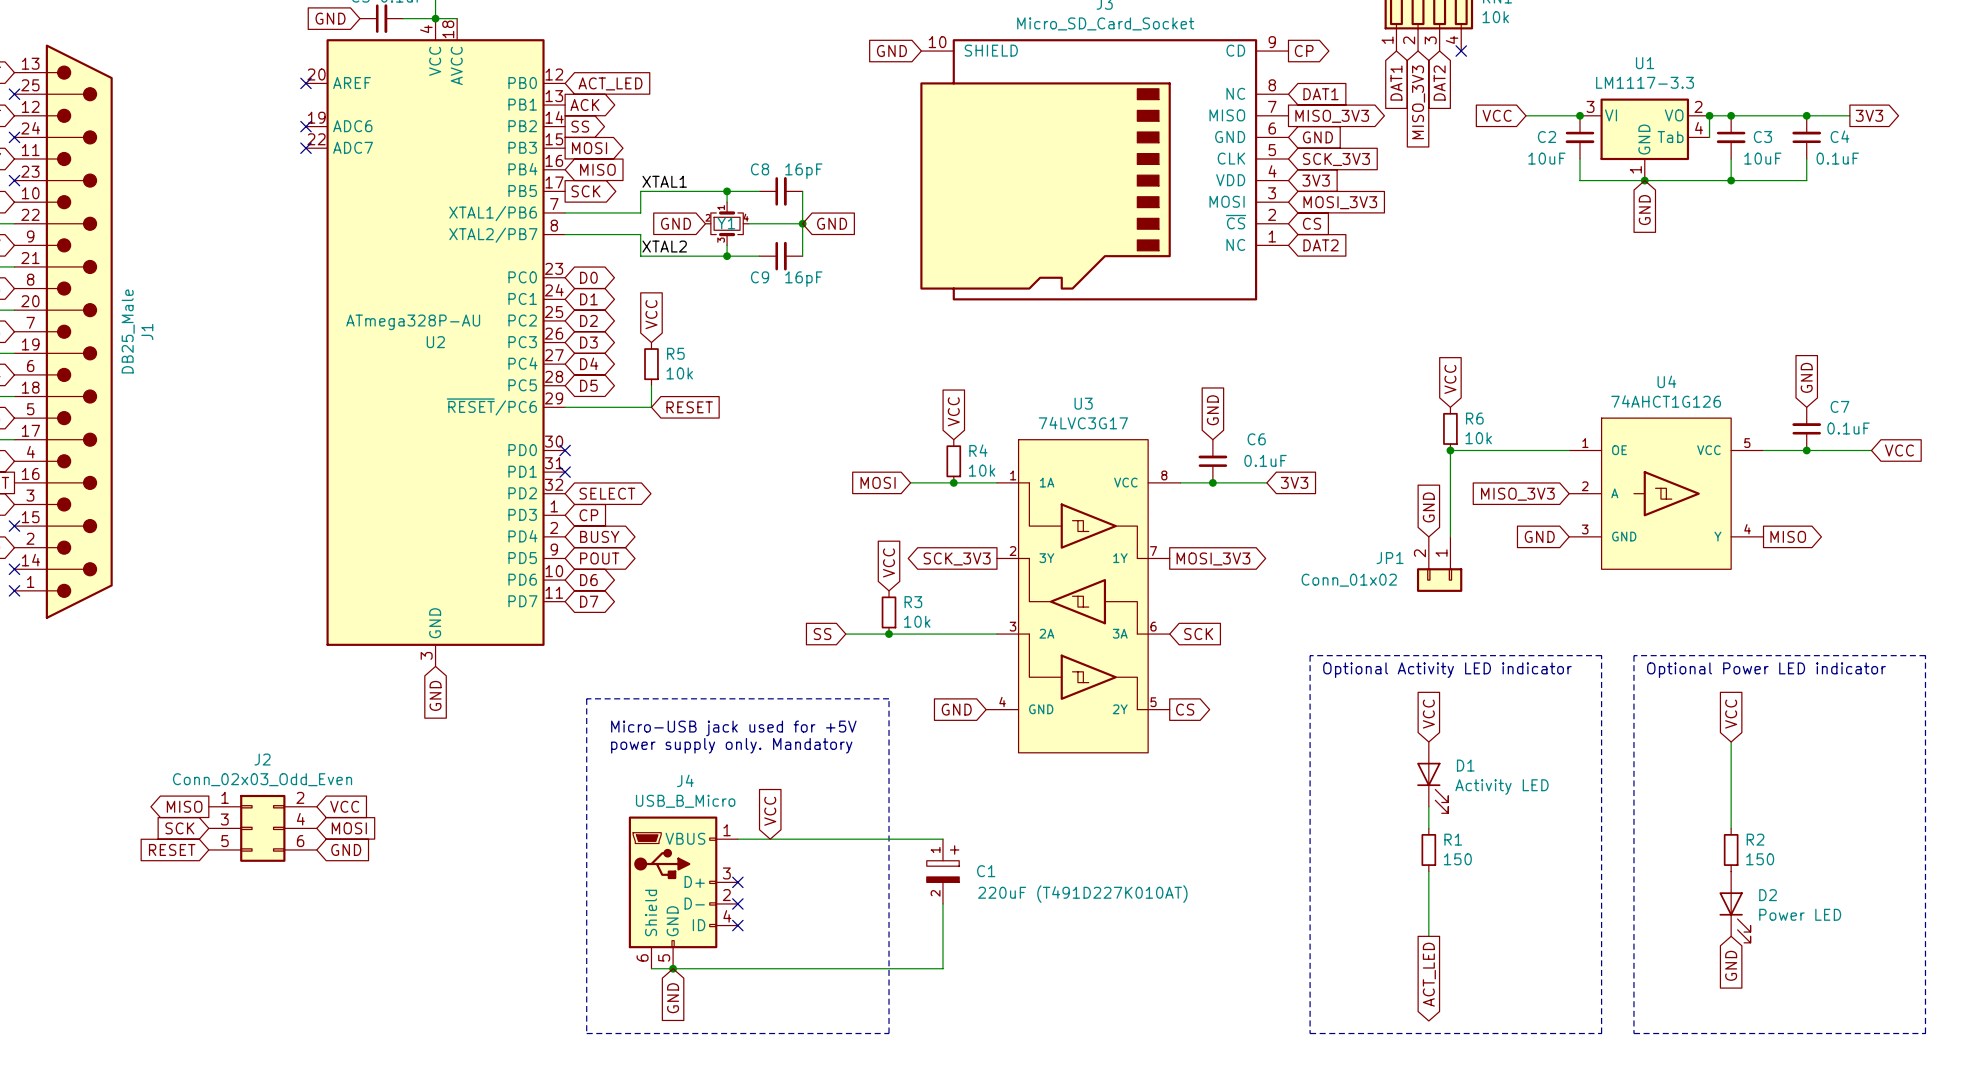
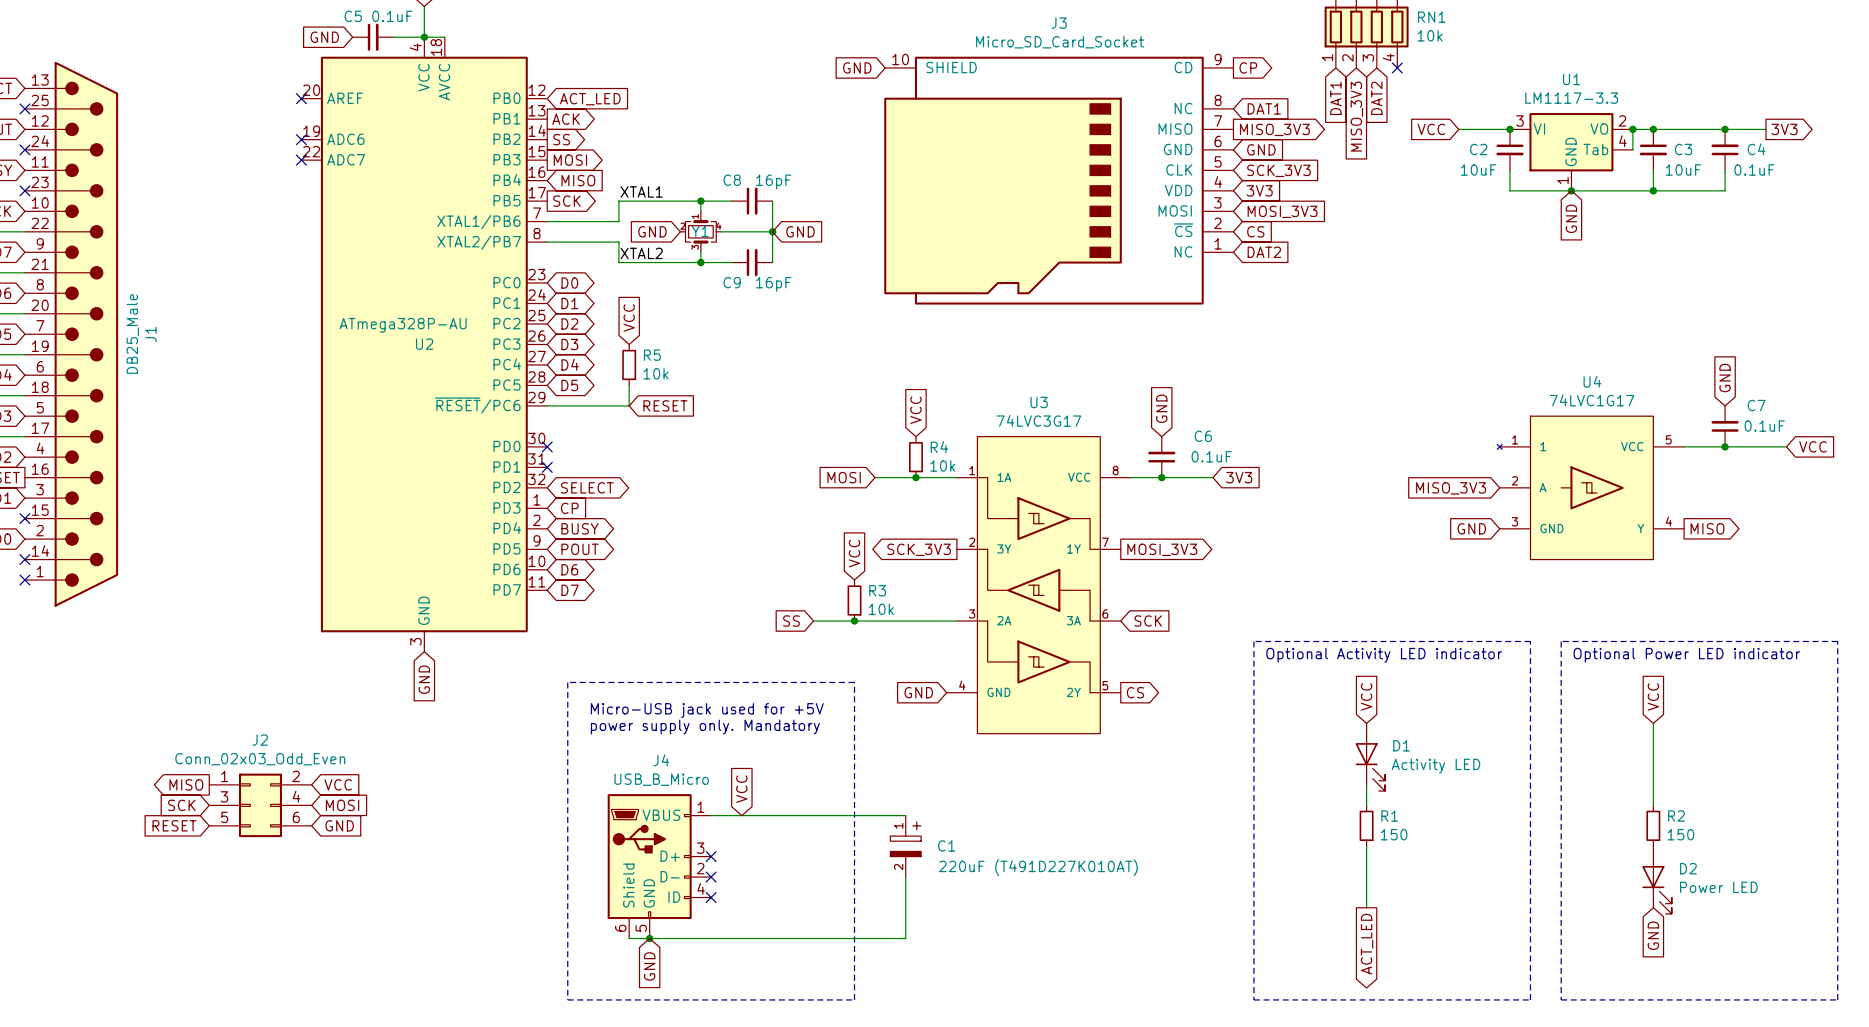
global label: VCC (1450, 379) -> none
U4 value: 74AHCT1G126 (1666, 401) -> 74LVC1G17 (1591, 400)
U4 symbol: [1569, 418, 1764, 570] -> [1497, 416, 1685, 560]
R6: 10k (1450, 428) -> none
junction: (1450, 450) -> none
wire: (1569, 450) (1450, 450) (1450, 536) -> none
global label: GND (1428, 507) -> none
JP1: Conn_01x02 (1439, 564) -> none

